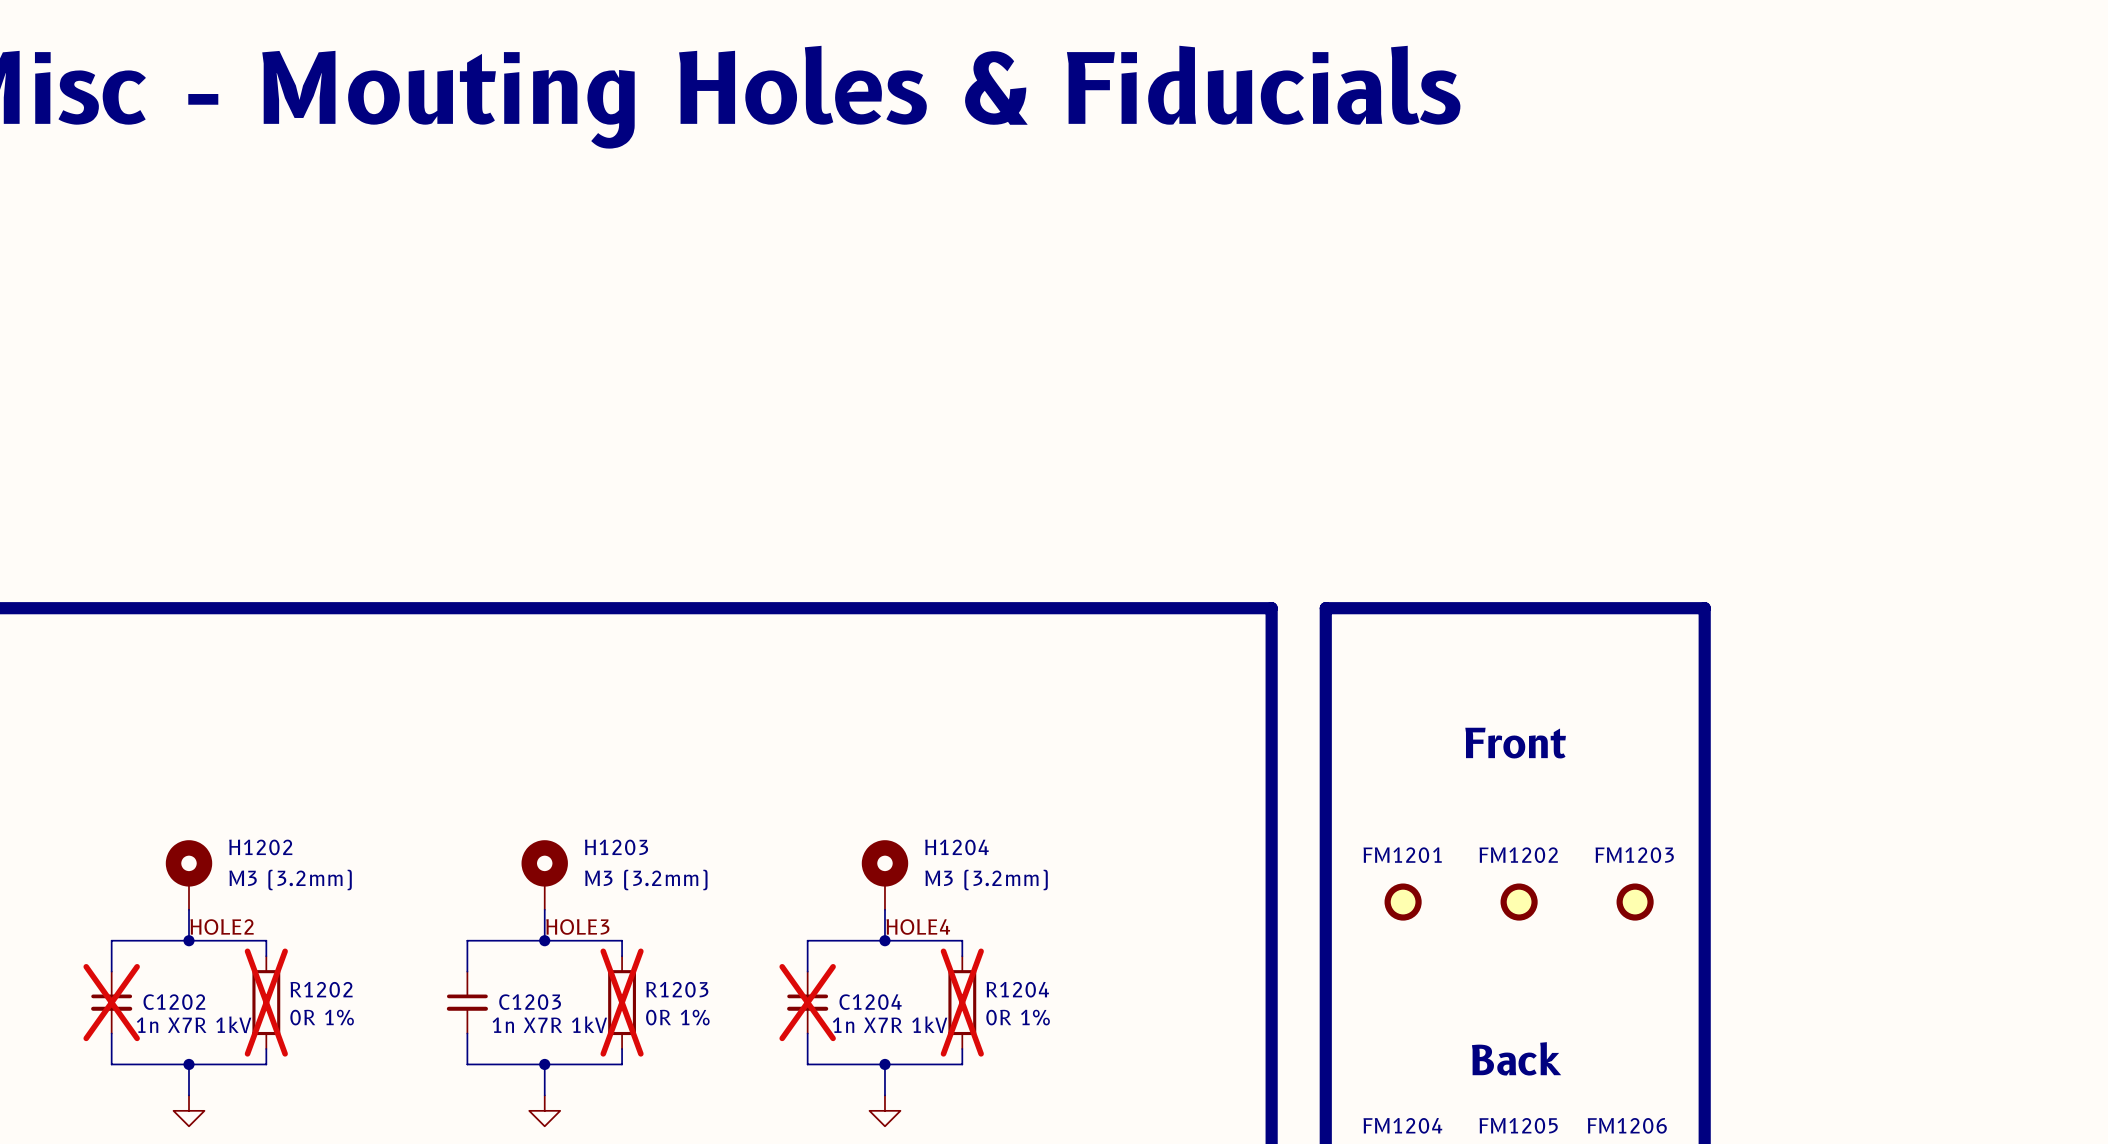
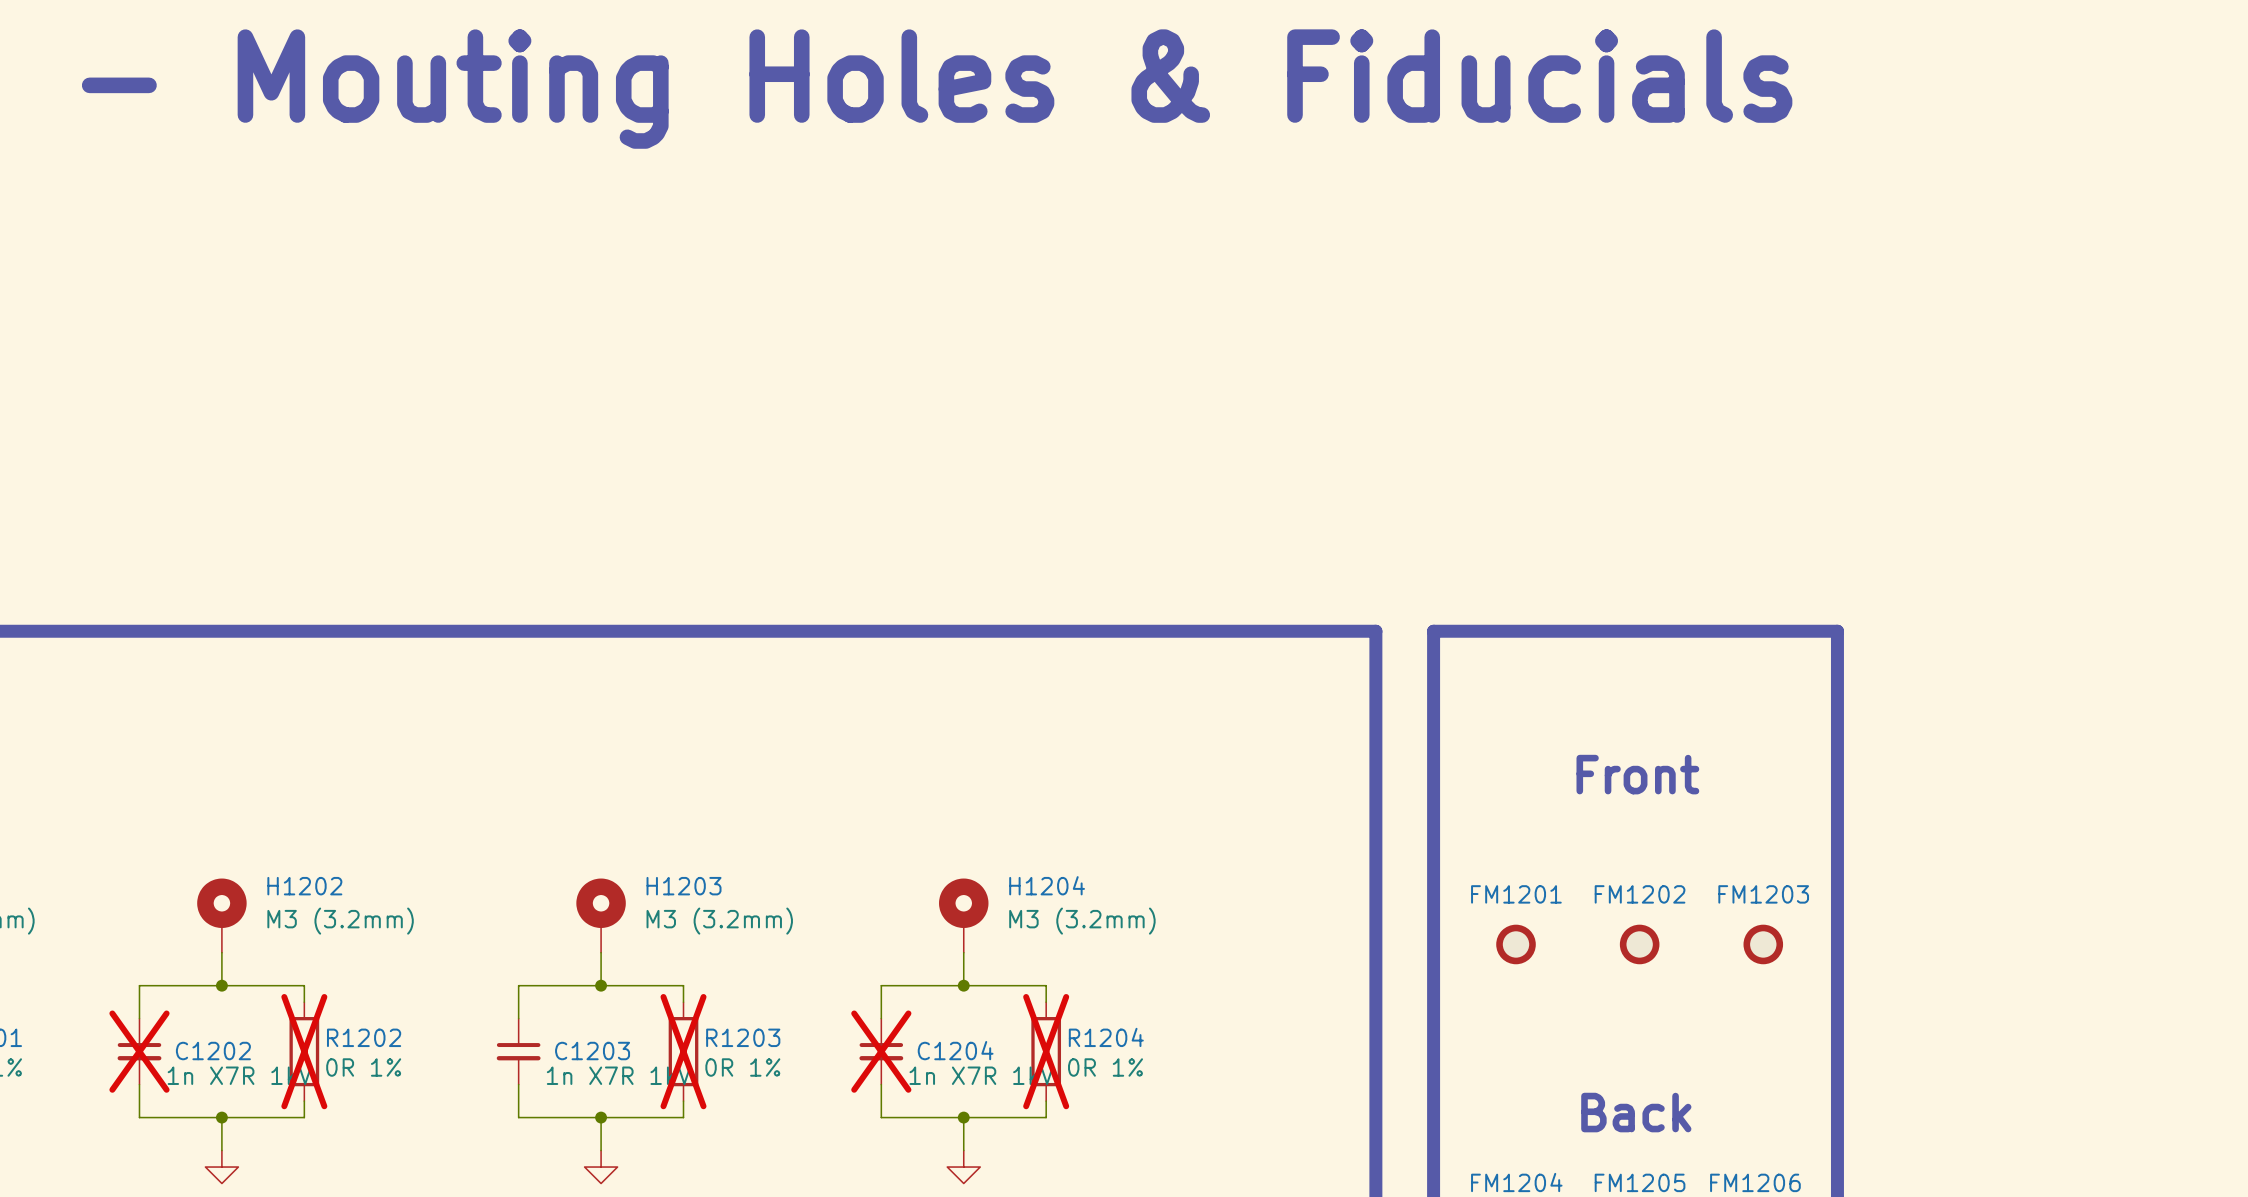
label: HOLE2 (222, 927) -> none
label: HOLE3 (577, 927) -> none
label: HOLE4 (918, 927) -> none

